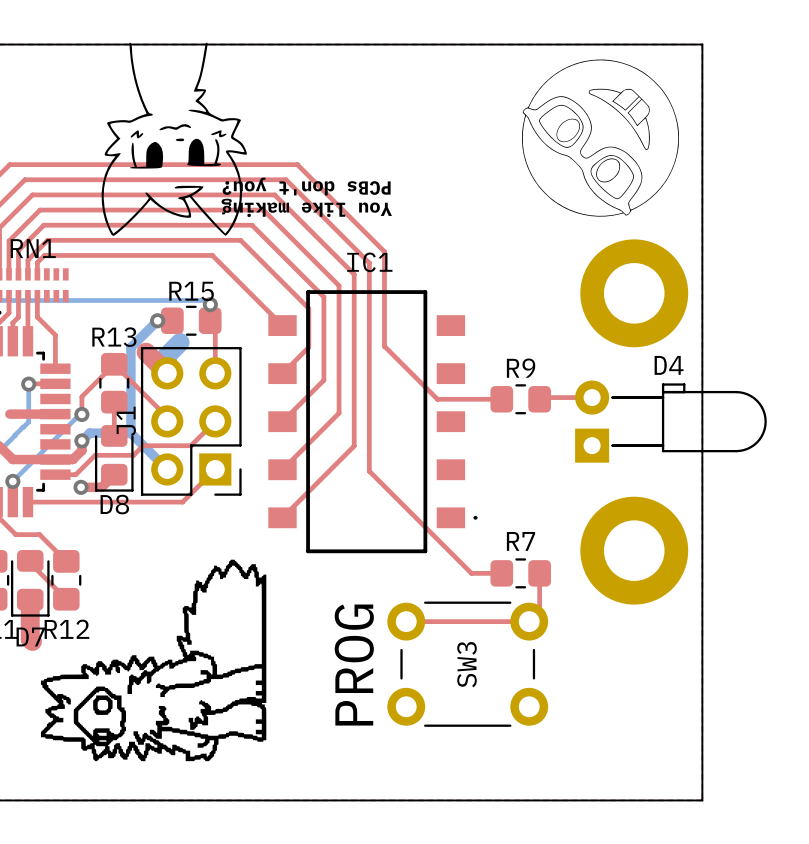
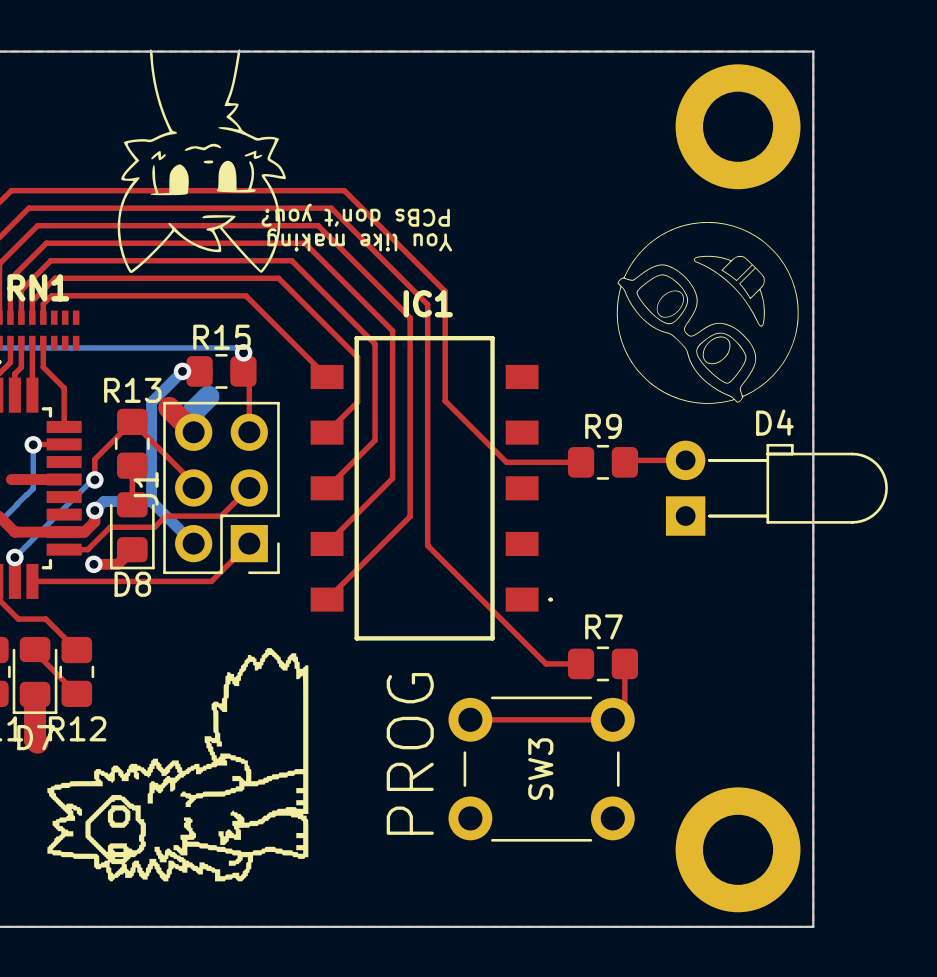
drawing position: (600, 138) -> (707, 312)
part position: (634, 293) -> (738, 126)
part position: (634, 550) -> (738, 849)

